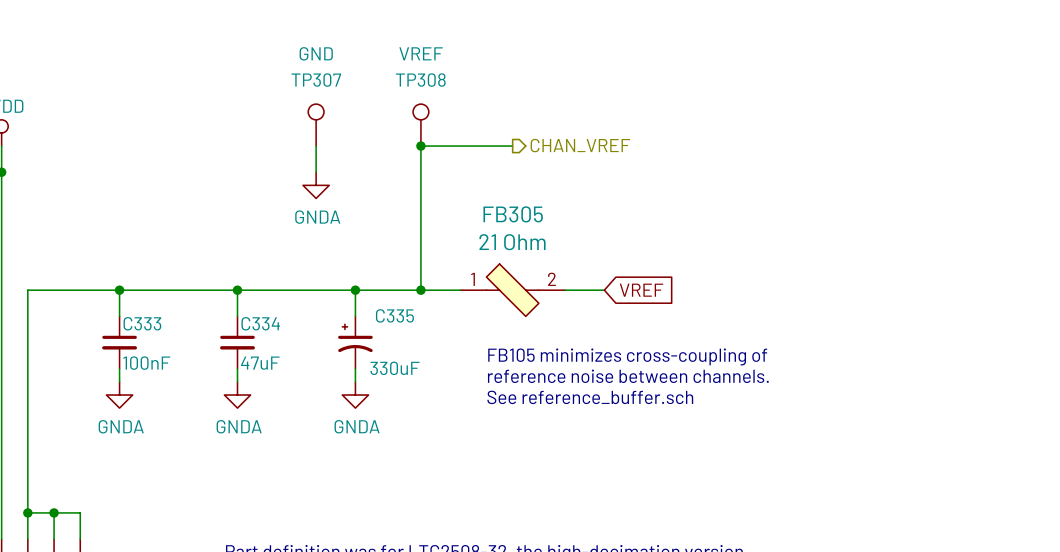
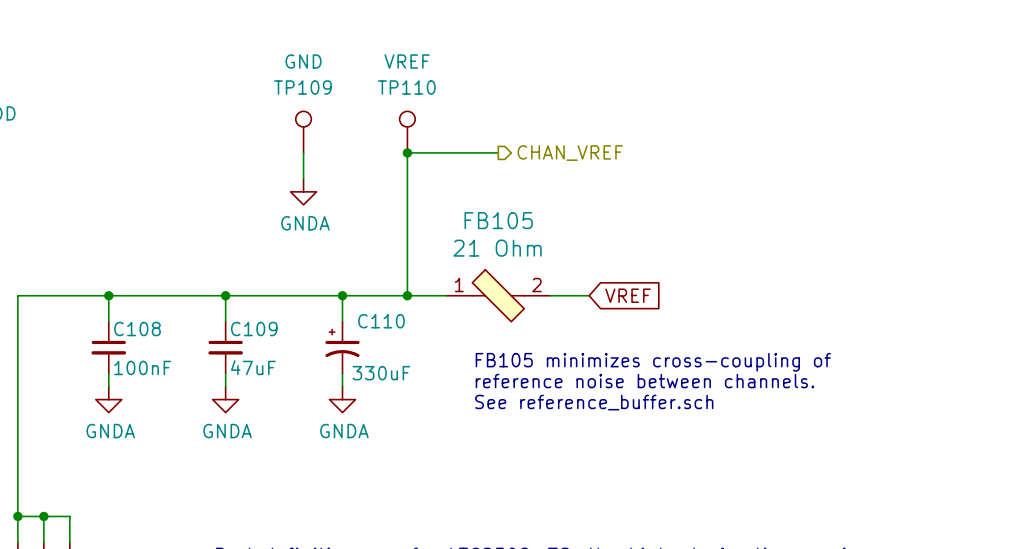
TP307 name: TP307 (316, 80) -> TP109 (302, 87)
TP308 name: TP308 (420, 80) -> TP110 (406, 87)
FB305 name: FB305 (513, 214) -> FB105 (498, 220)
C335 name: C335 (394, 315) -> C110 (381, 321)
C333 name: C333 (142, 323) -> C108 (137, 329)
C334 name: C334 (260, 323) -> C109 (254, 329)

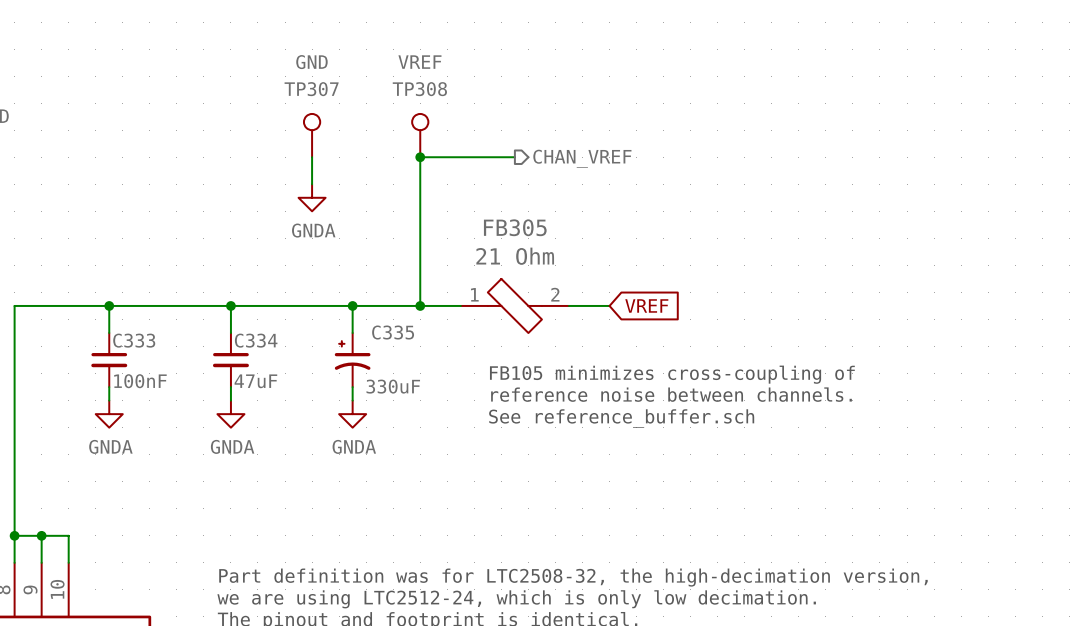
TP109 name: TP109 (302, 87) -> TP307 (311, 89)
TP110 name: TP110 (406, 87) -> TP308 (419, 89)
FB105 name: FB105 (498, 220) -> FB305 (515, 227)
C110 name: C110 (381, 321) -> C335 (393, 332)
C108 name: C108 (137, 329) -> C333 (134, 340)
C109 name: C109 (254, 329) -> C334 (256, 340)

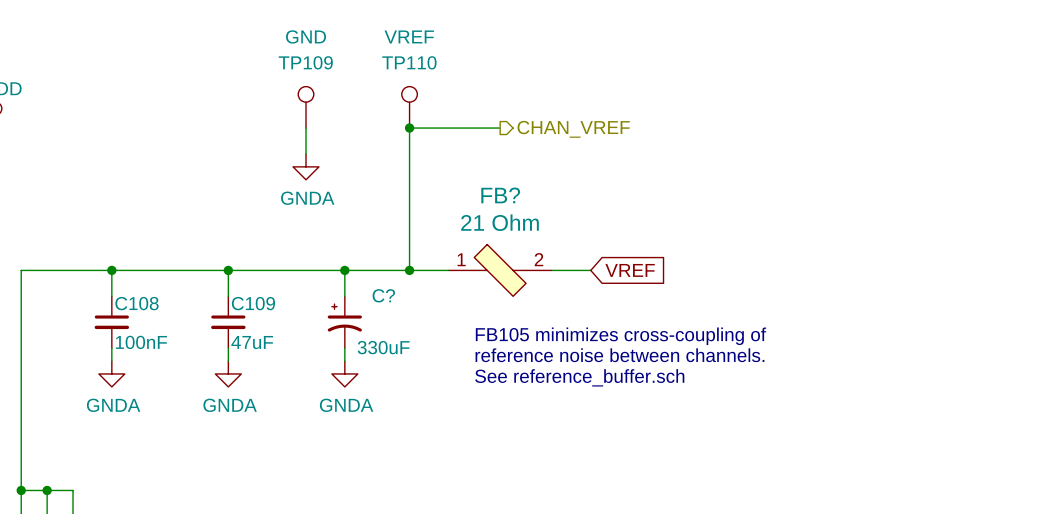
TP307 name: TP307 (311, 89) -> TP109 (305, 62)
TP308 name: TP308 (419, 89) -> TP110 (409, 62)
FB305 name: FB305 (515, 227) -> FB? (500, 195)
C335 name: C335 (393, 332) -> C? (383, 295)
C333 name: C333 (134, 340) -> C108 (136, 303)
C334 name: C334 (256, 340) -> C109 (253, 303)

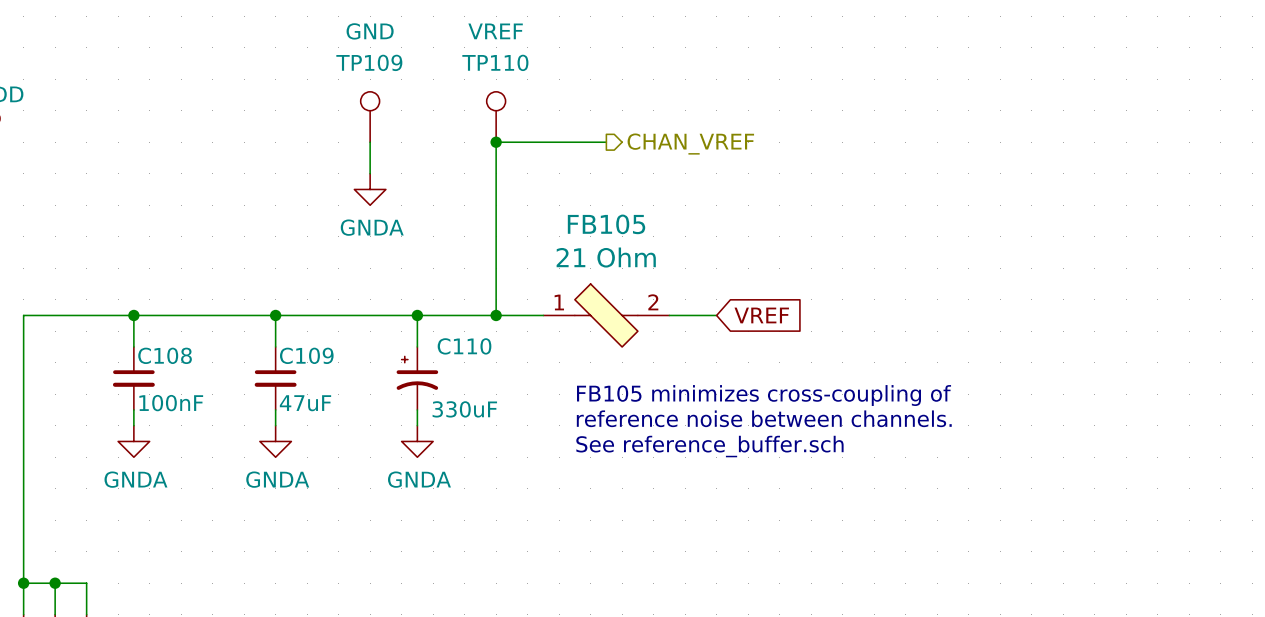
FB? name: FB? (500, 195) -> FB105 (606, 224)
C? name: C? (383, 295) -> C110 (464, 346)

